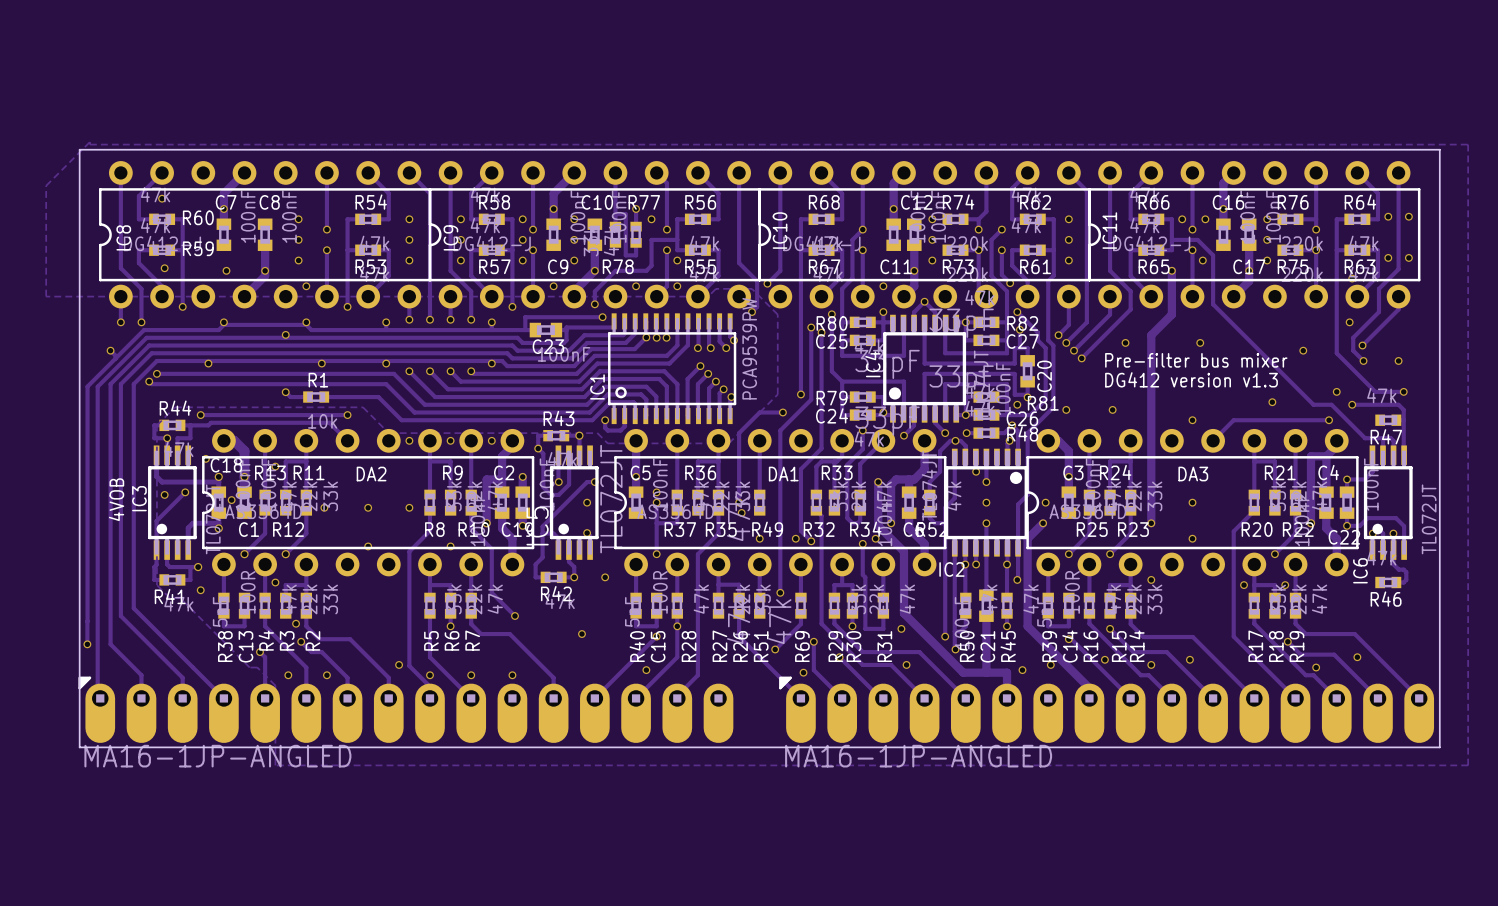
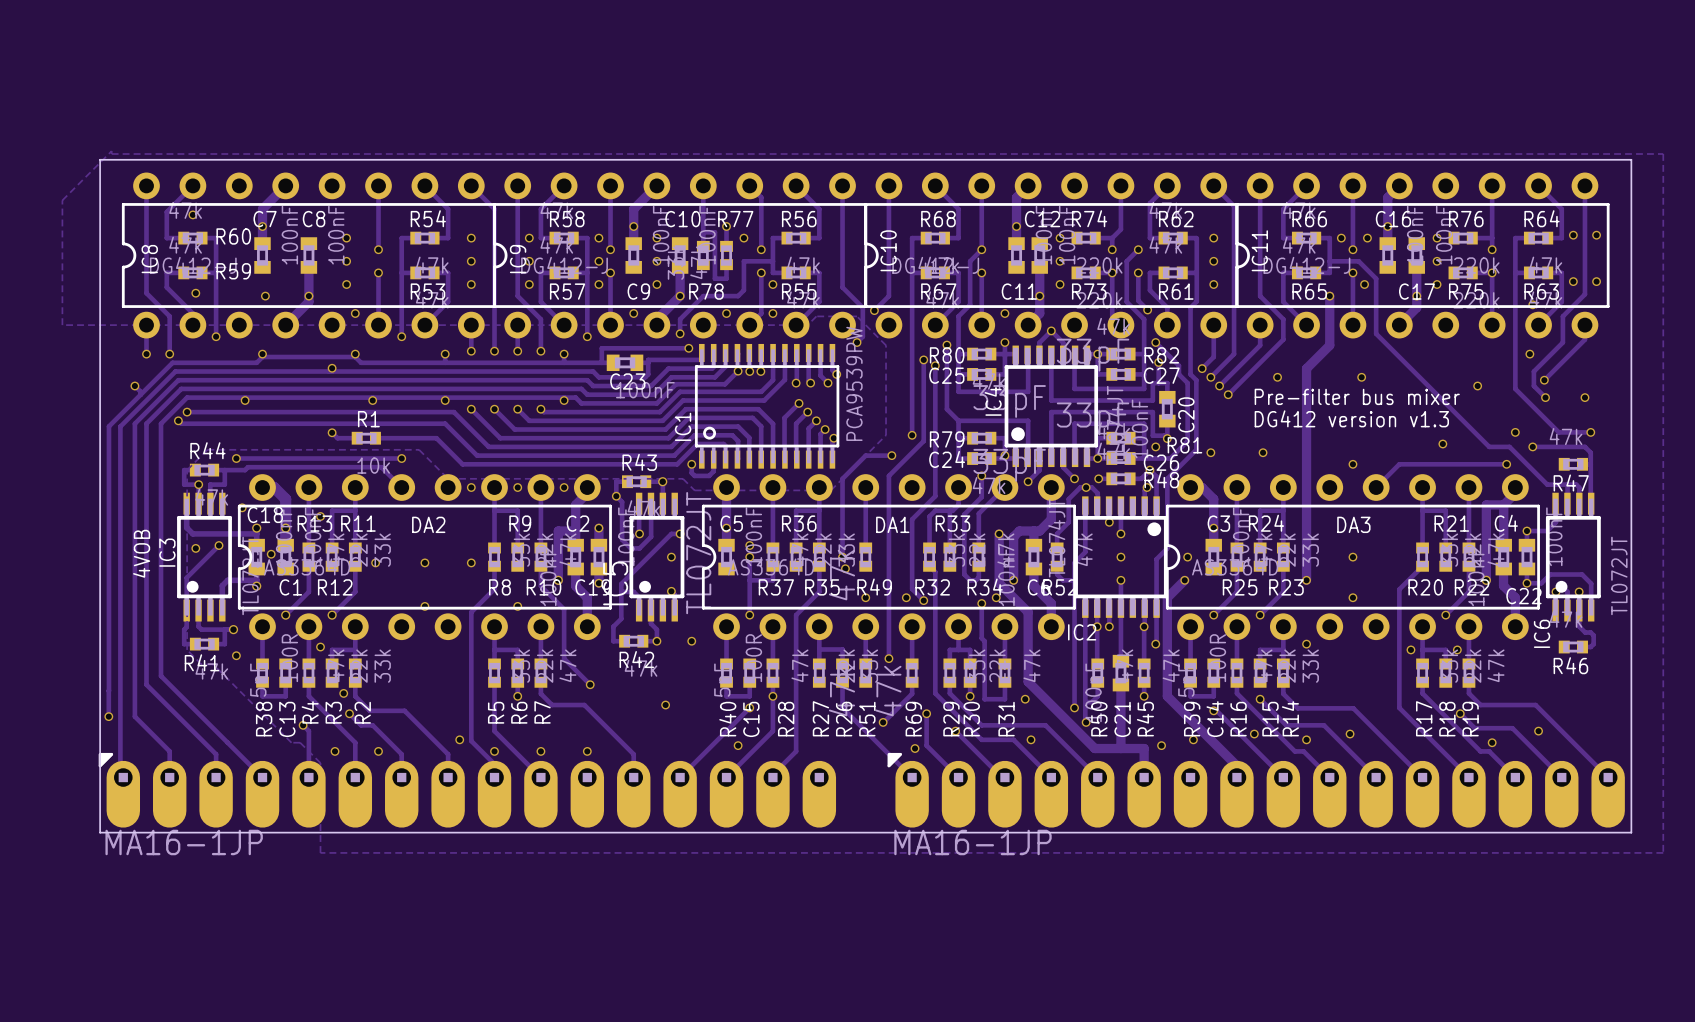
part value: MA16-1JP-ANGLED (217, 756) -> MA16-1JP (184, 842)
part value: MA16-1JP-ANGLED (918, 756) -> MA16-1JP (972, 842)

